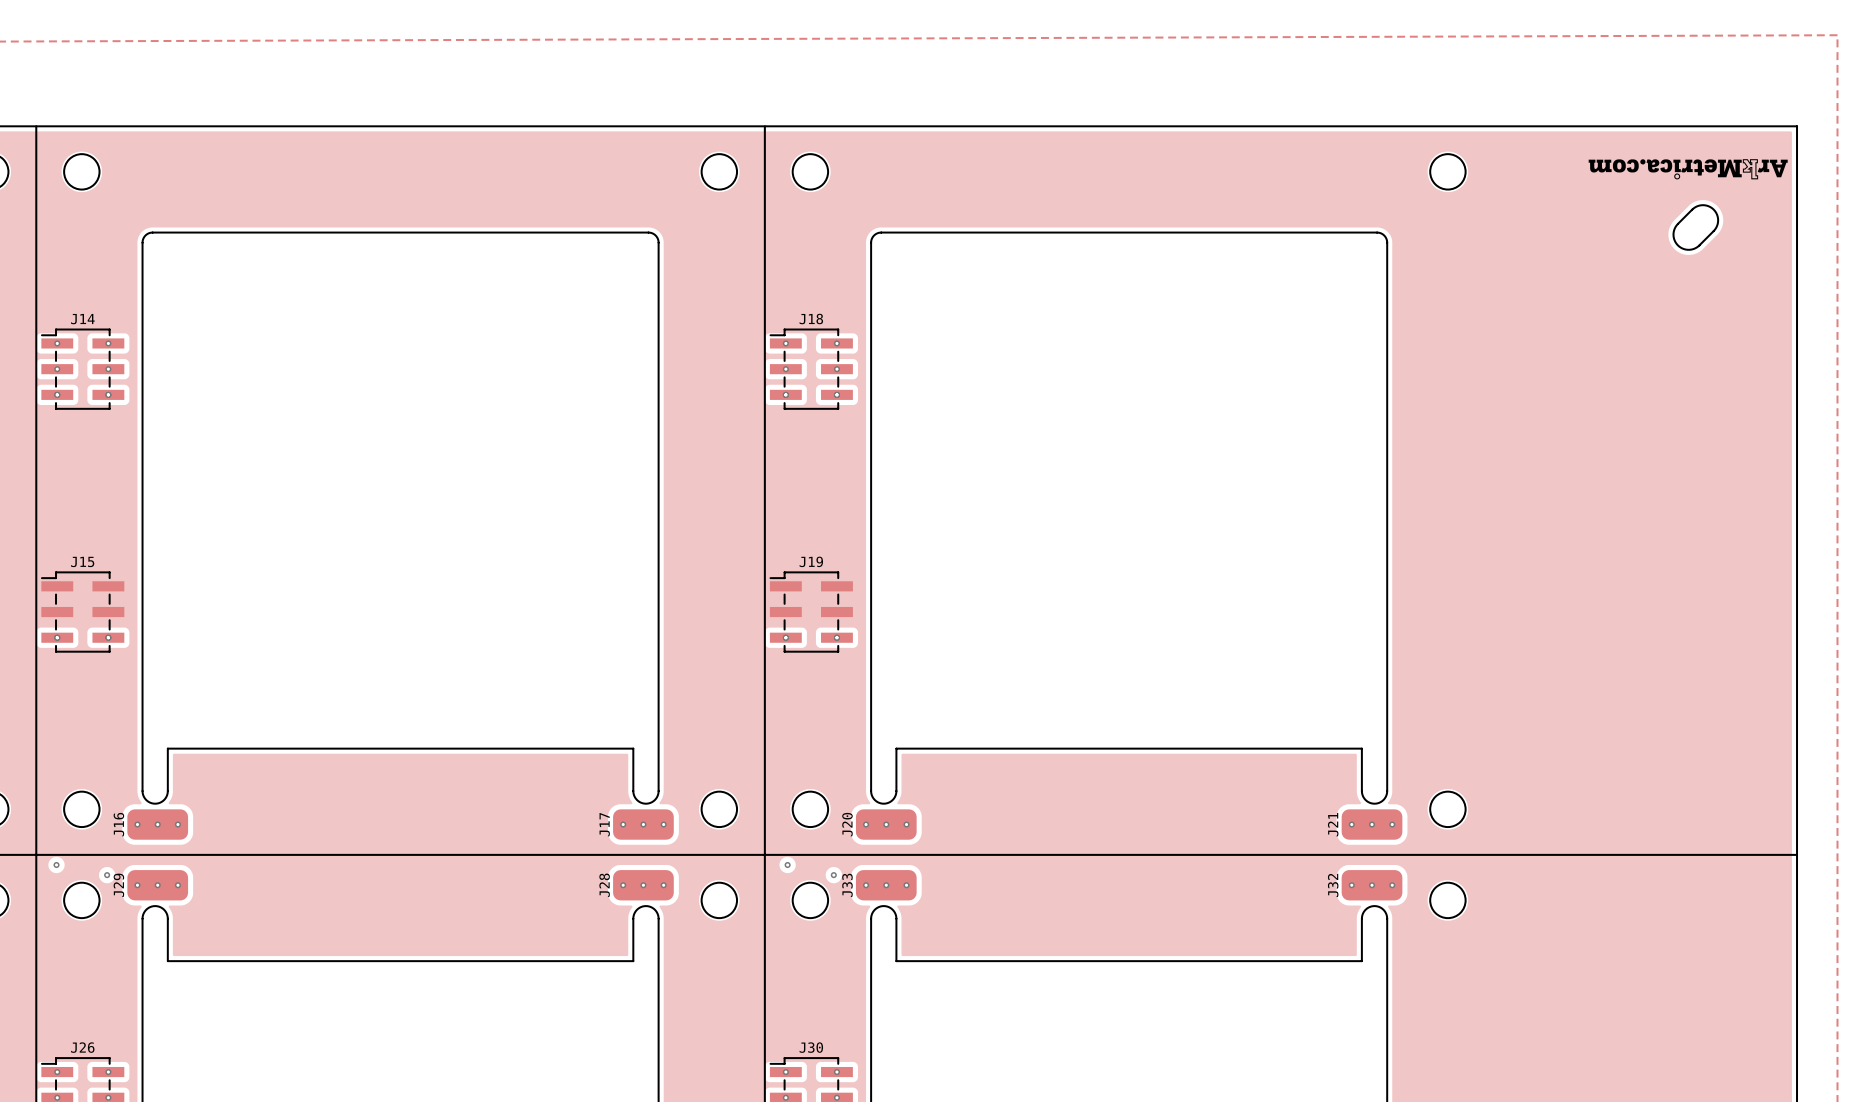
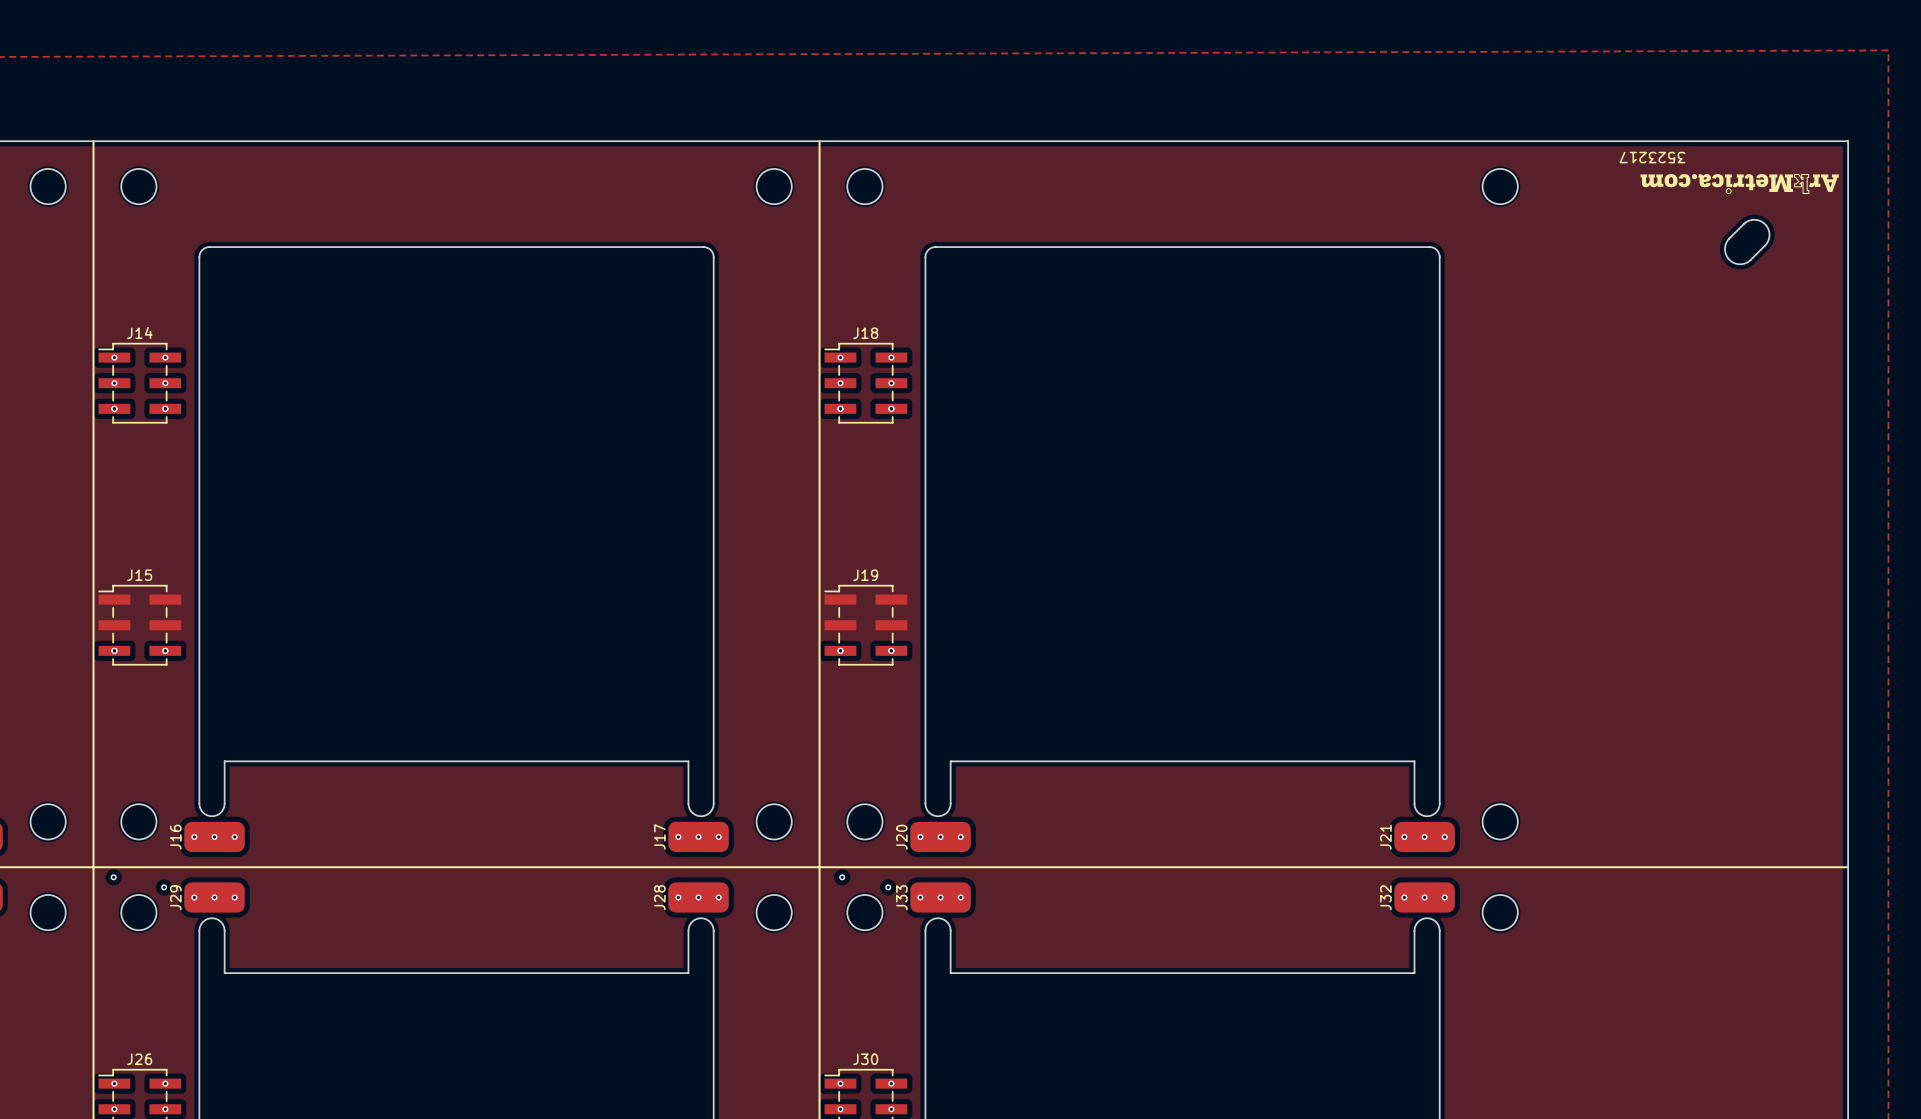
text: none -> 3523217 (1652, 157)

